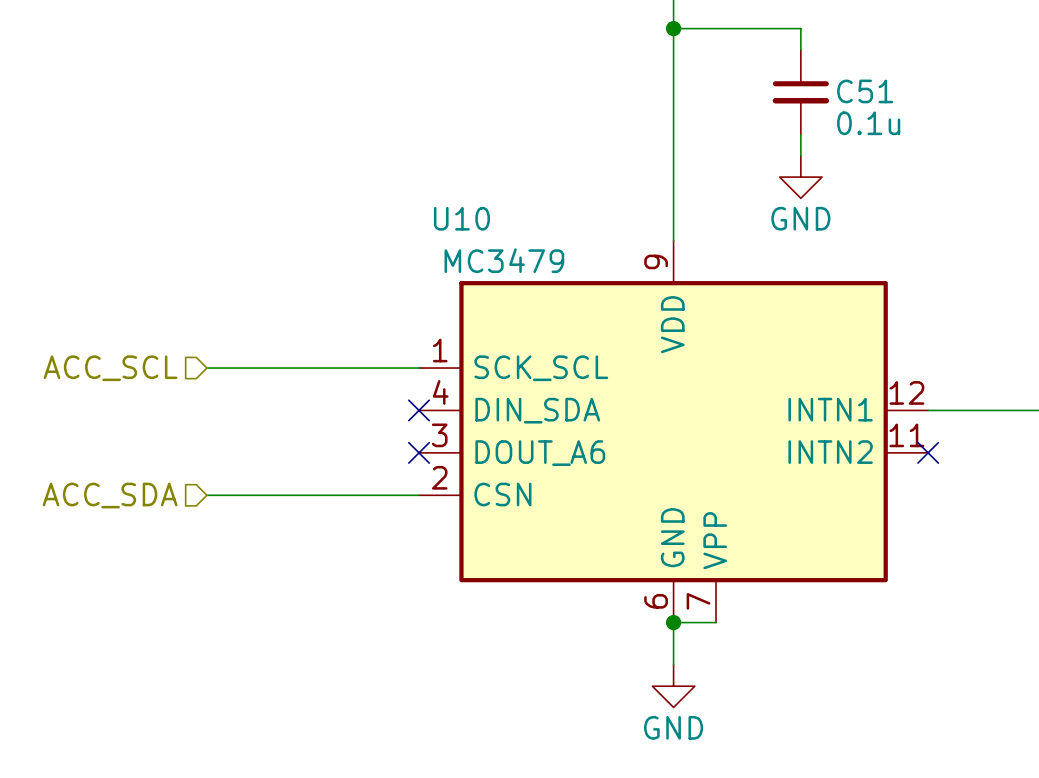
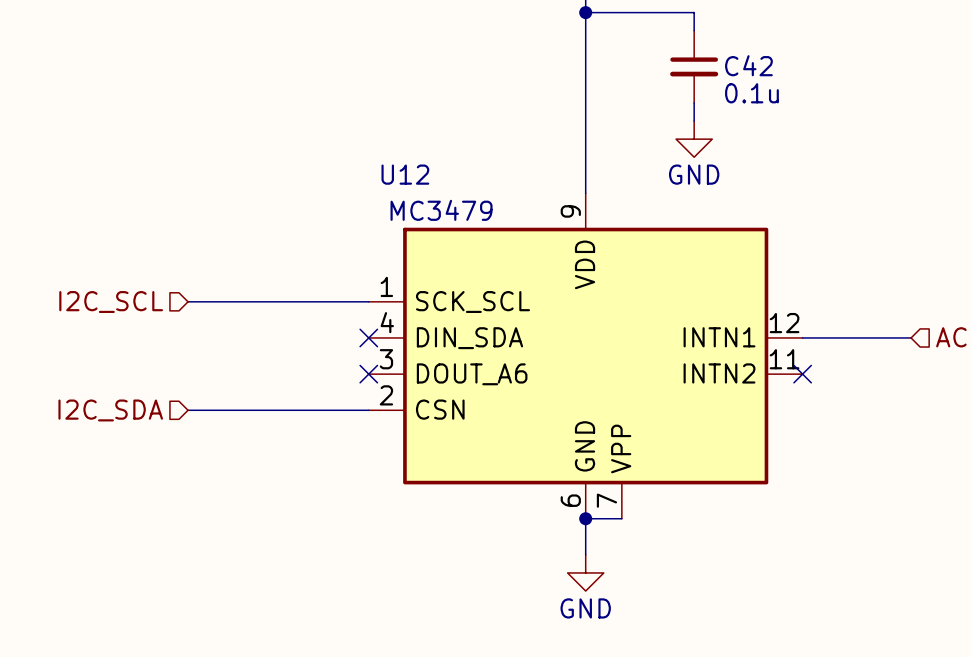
C51 name: C51 (865, 91) -> C42 (748, 65)
U10 name: U10 (461, 218) -> U12 (405, 174)
hierarchical label: ACC_SCL (110, 368) -> I2C_SCL (111, 302)
hierarchical label: ACC_SDA (110, 495) -> I2C_SDA (110, 410)

